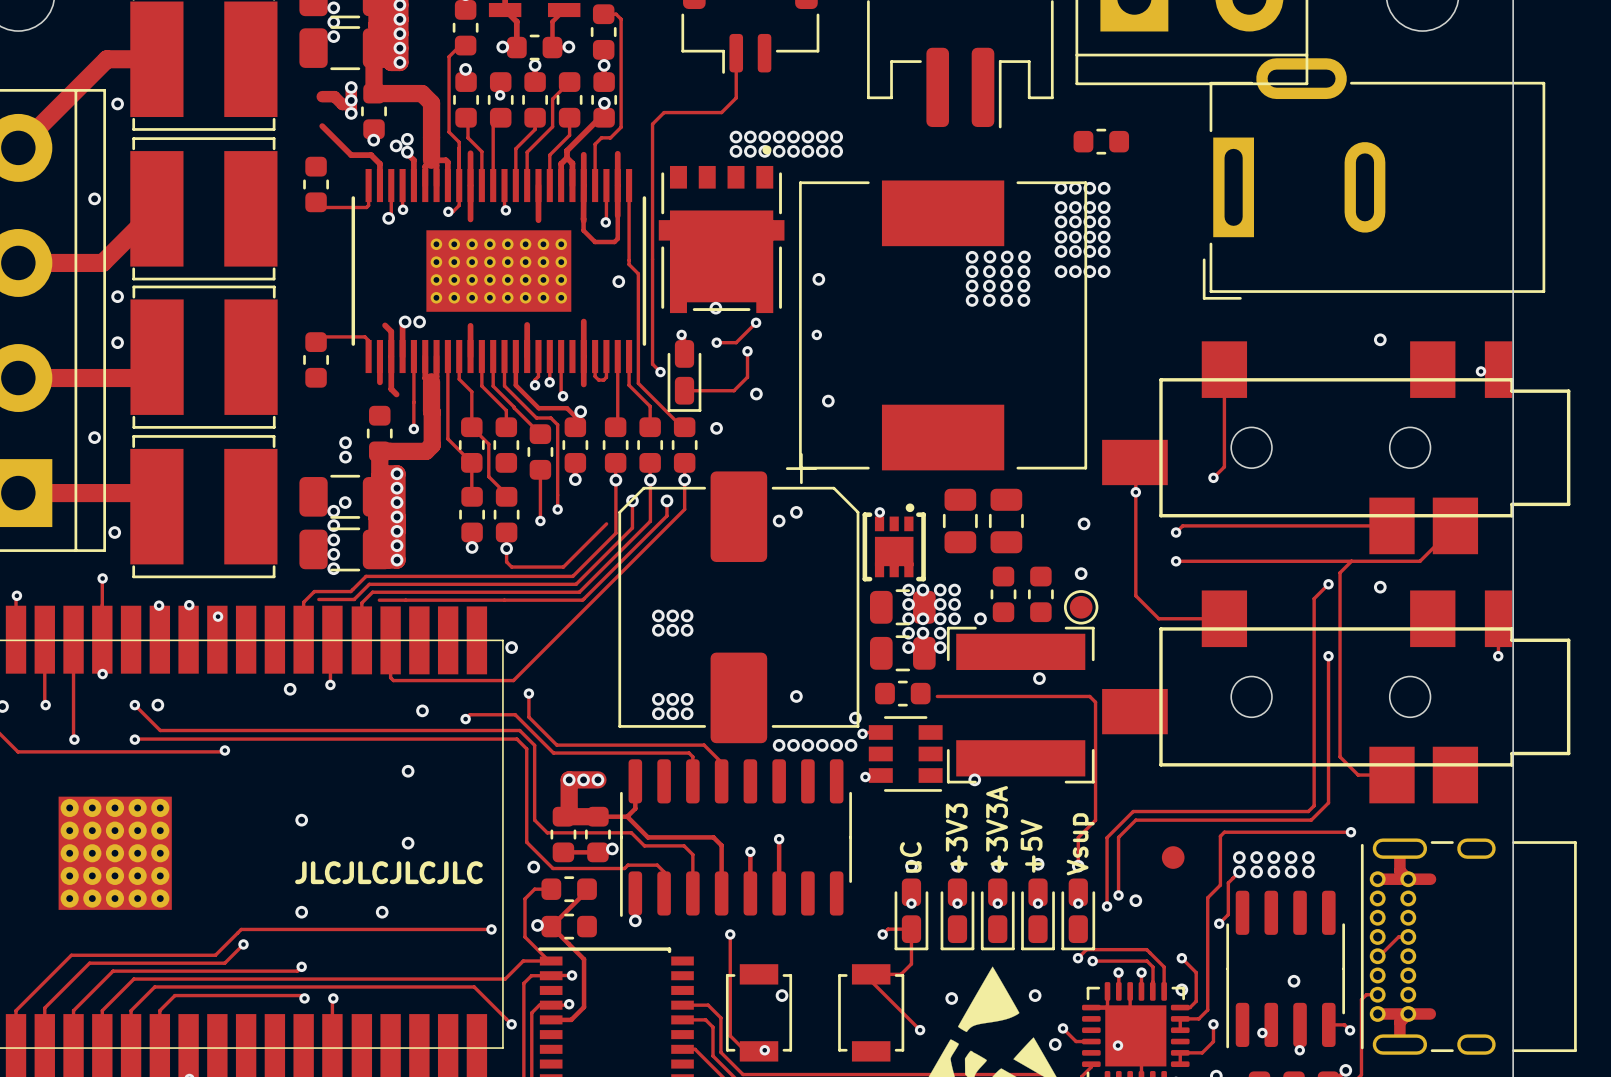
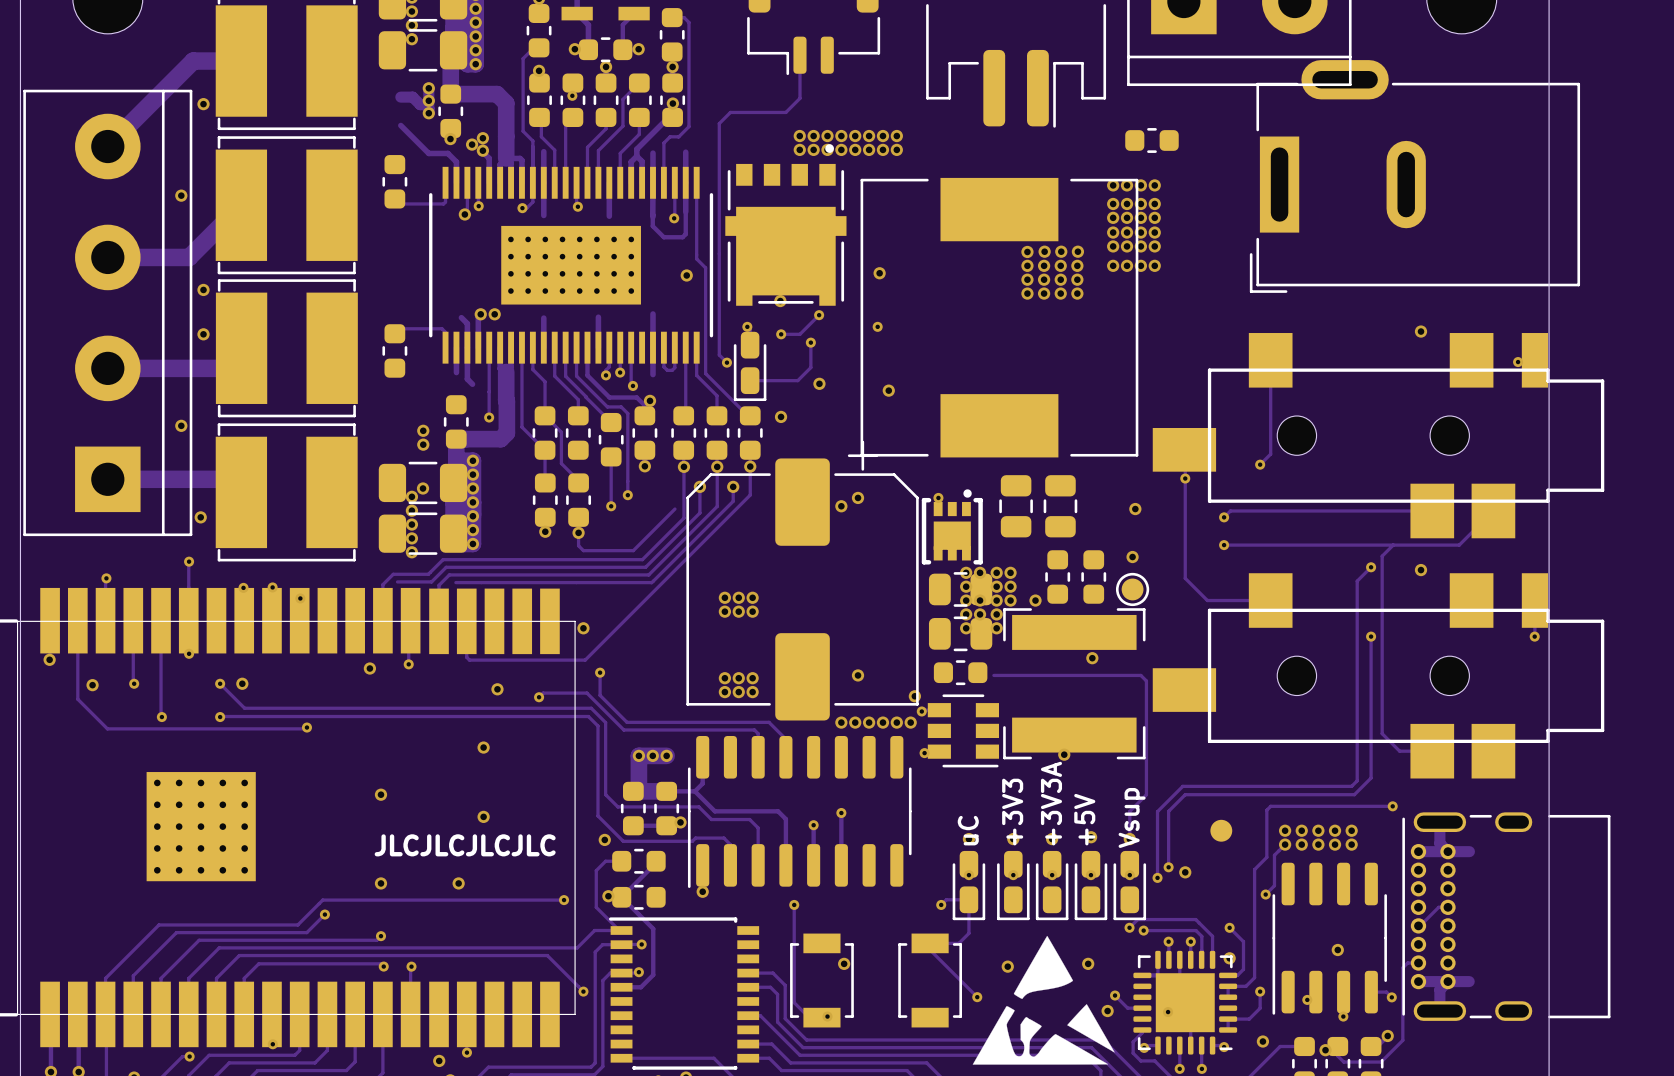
via position: (974, 779) -> (1064, 754)

